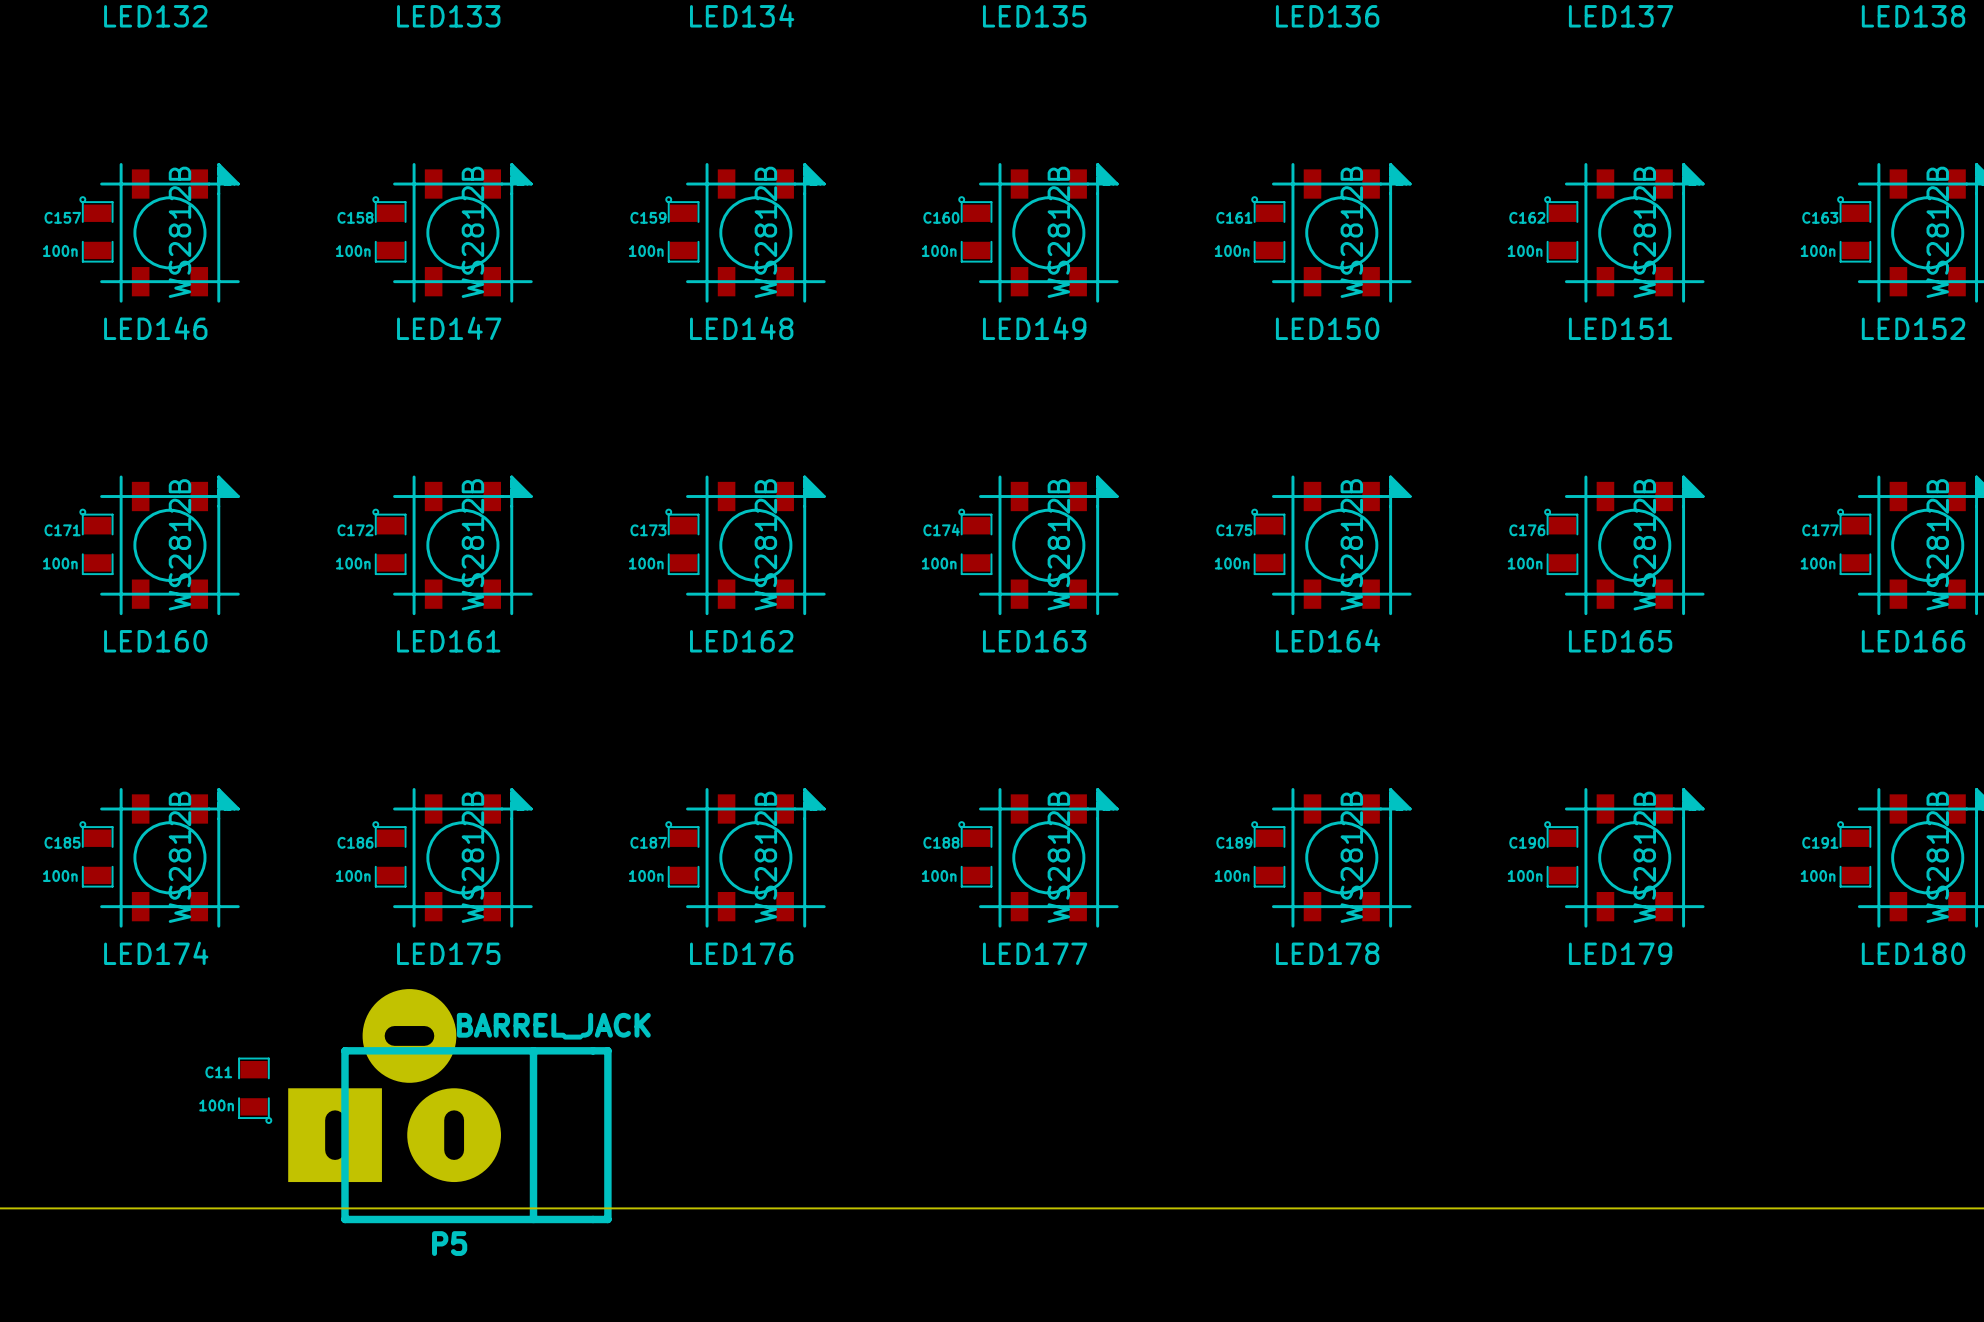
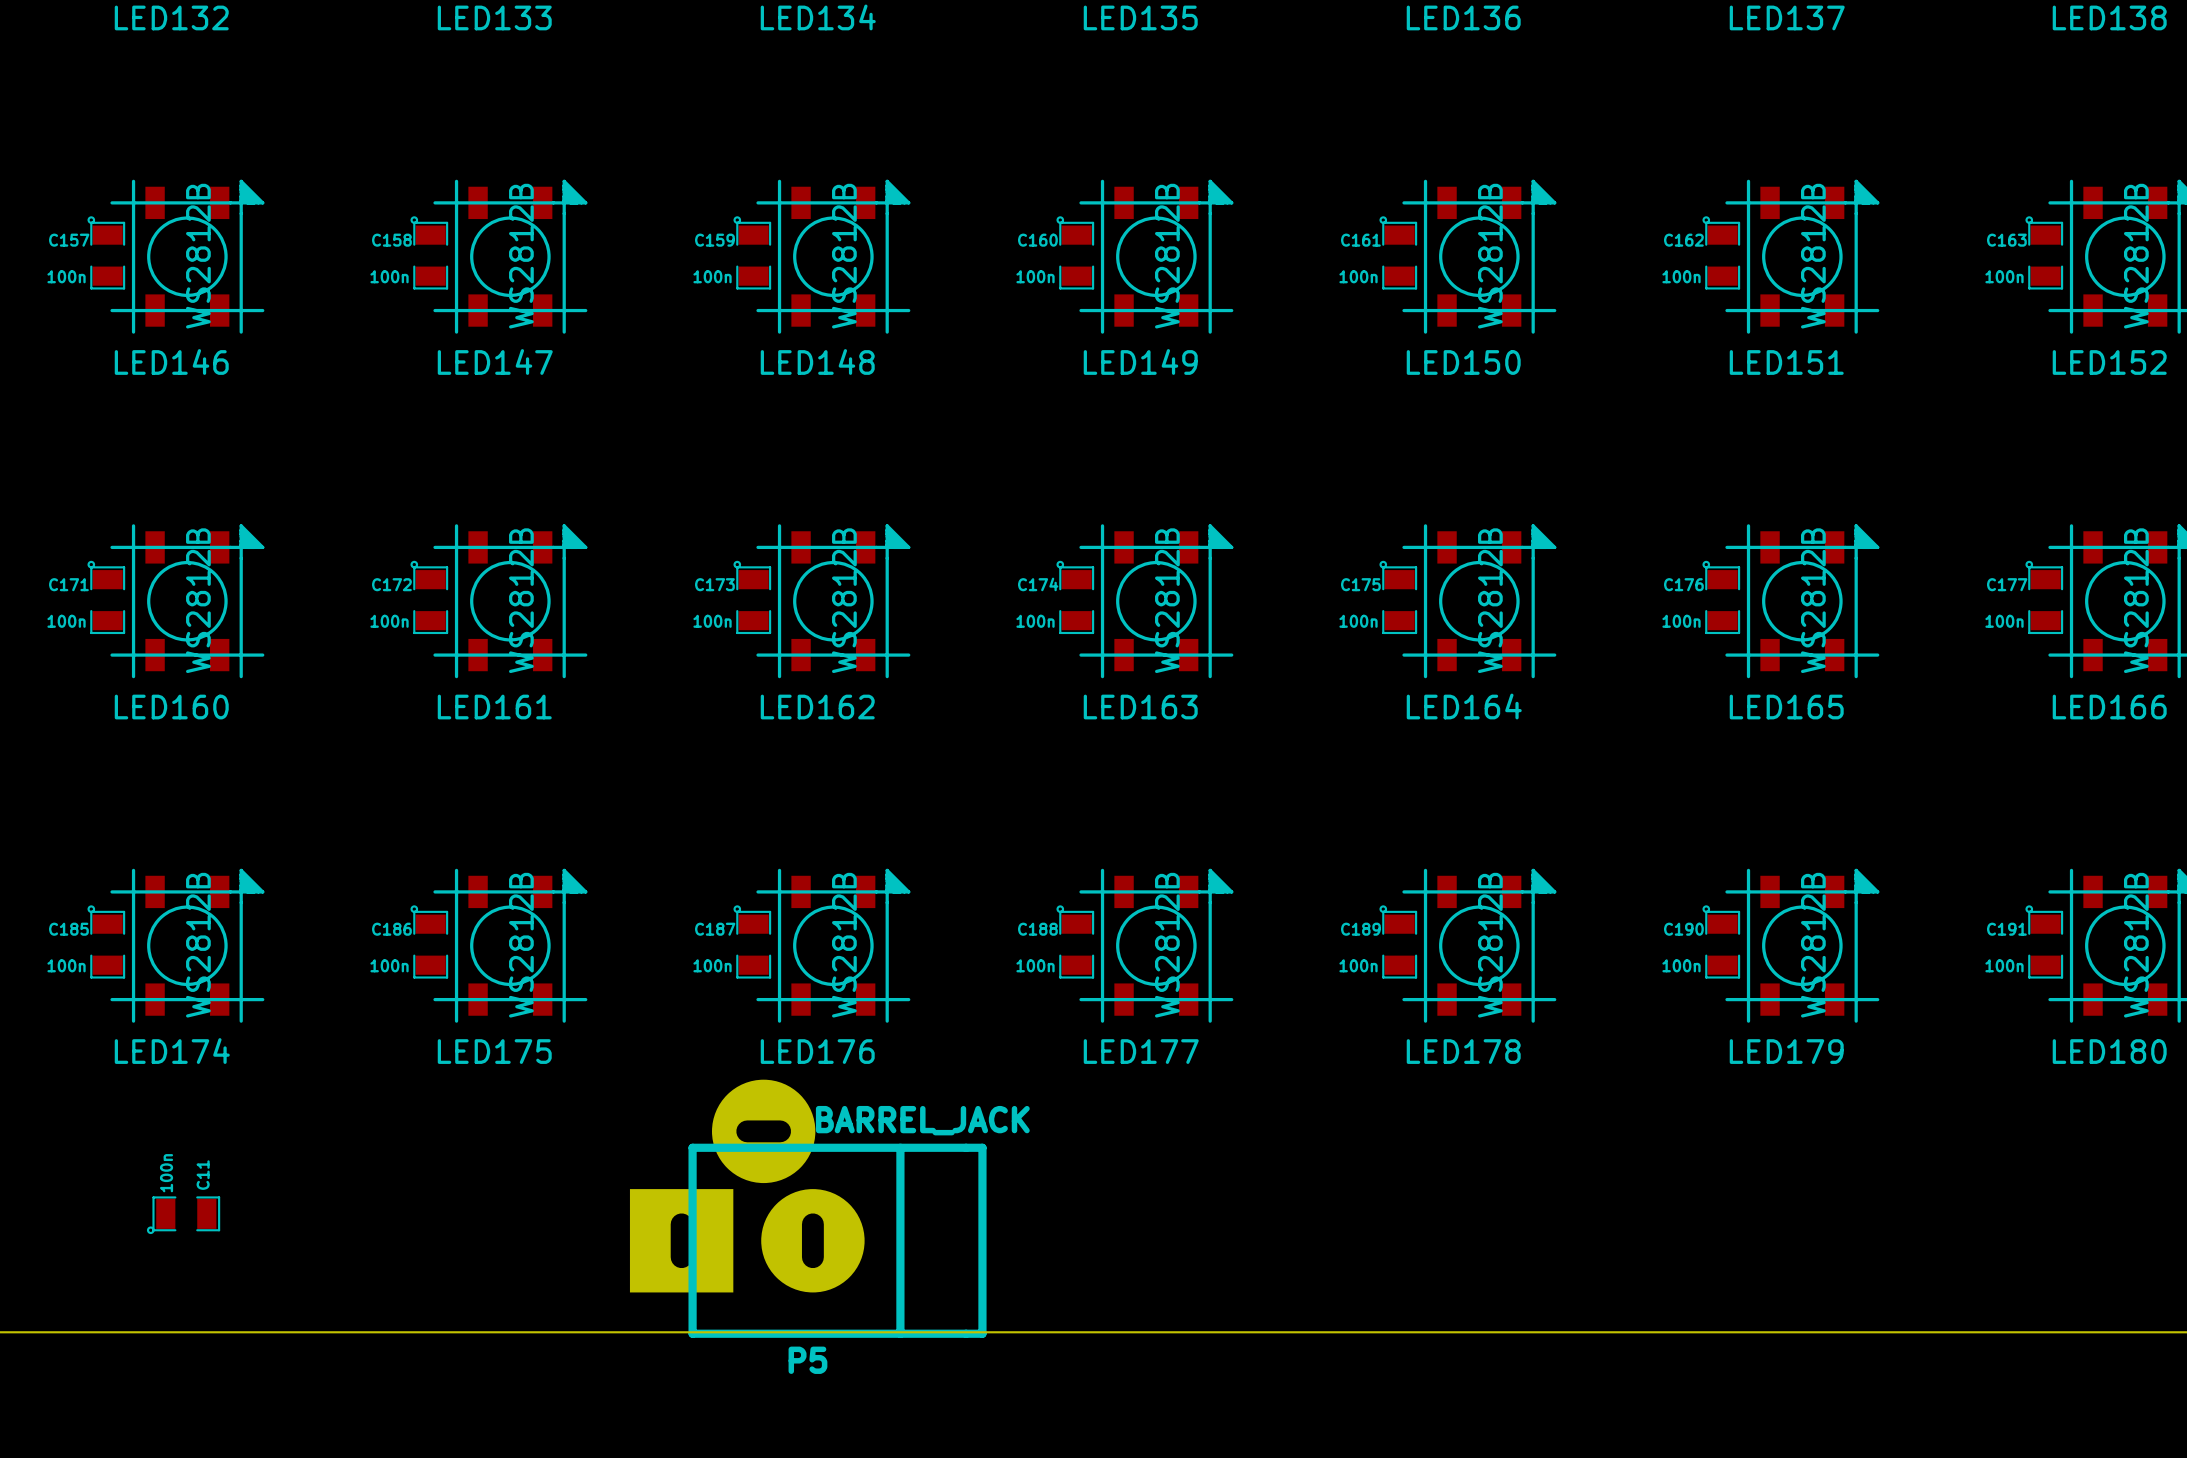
C11 rotation: 0° (255, 1090) -> 90° clockwise (183, 1215)
C11 position: (255, 1090) -> (183, 1215)
P5 position: (449, 1106) -> (808, 1208)

